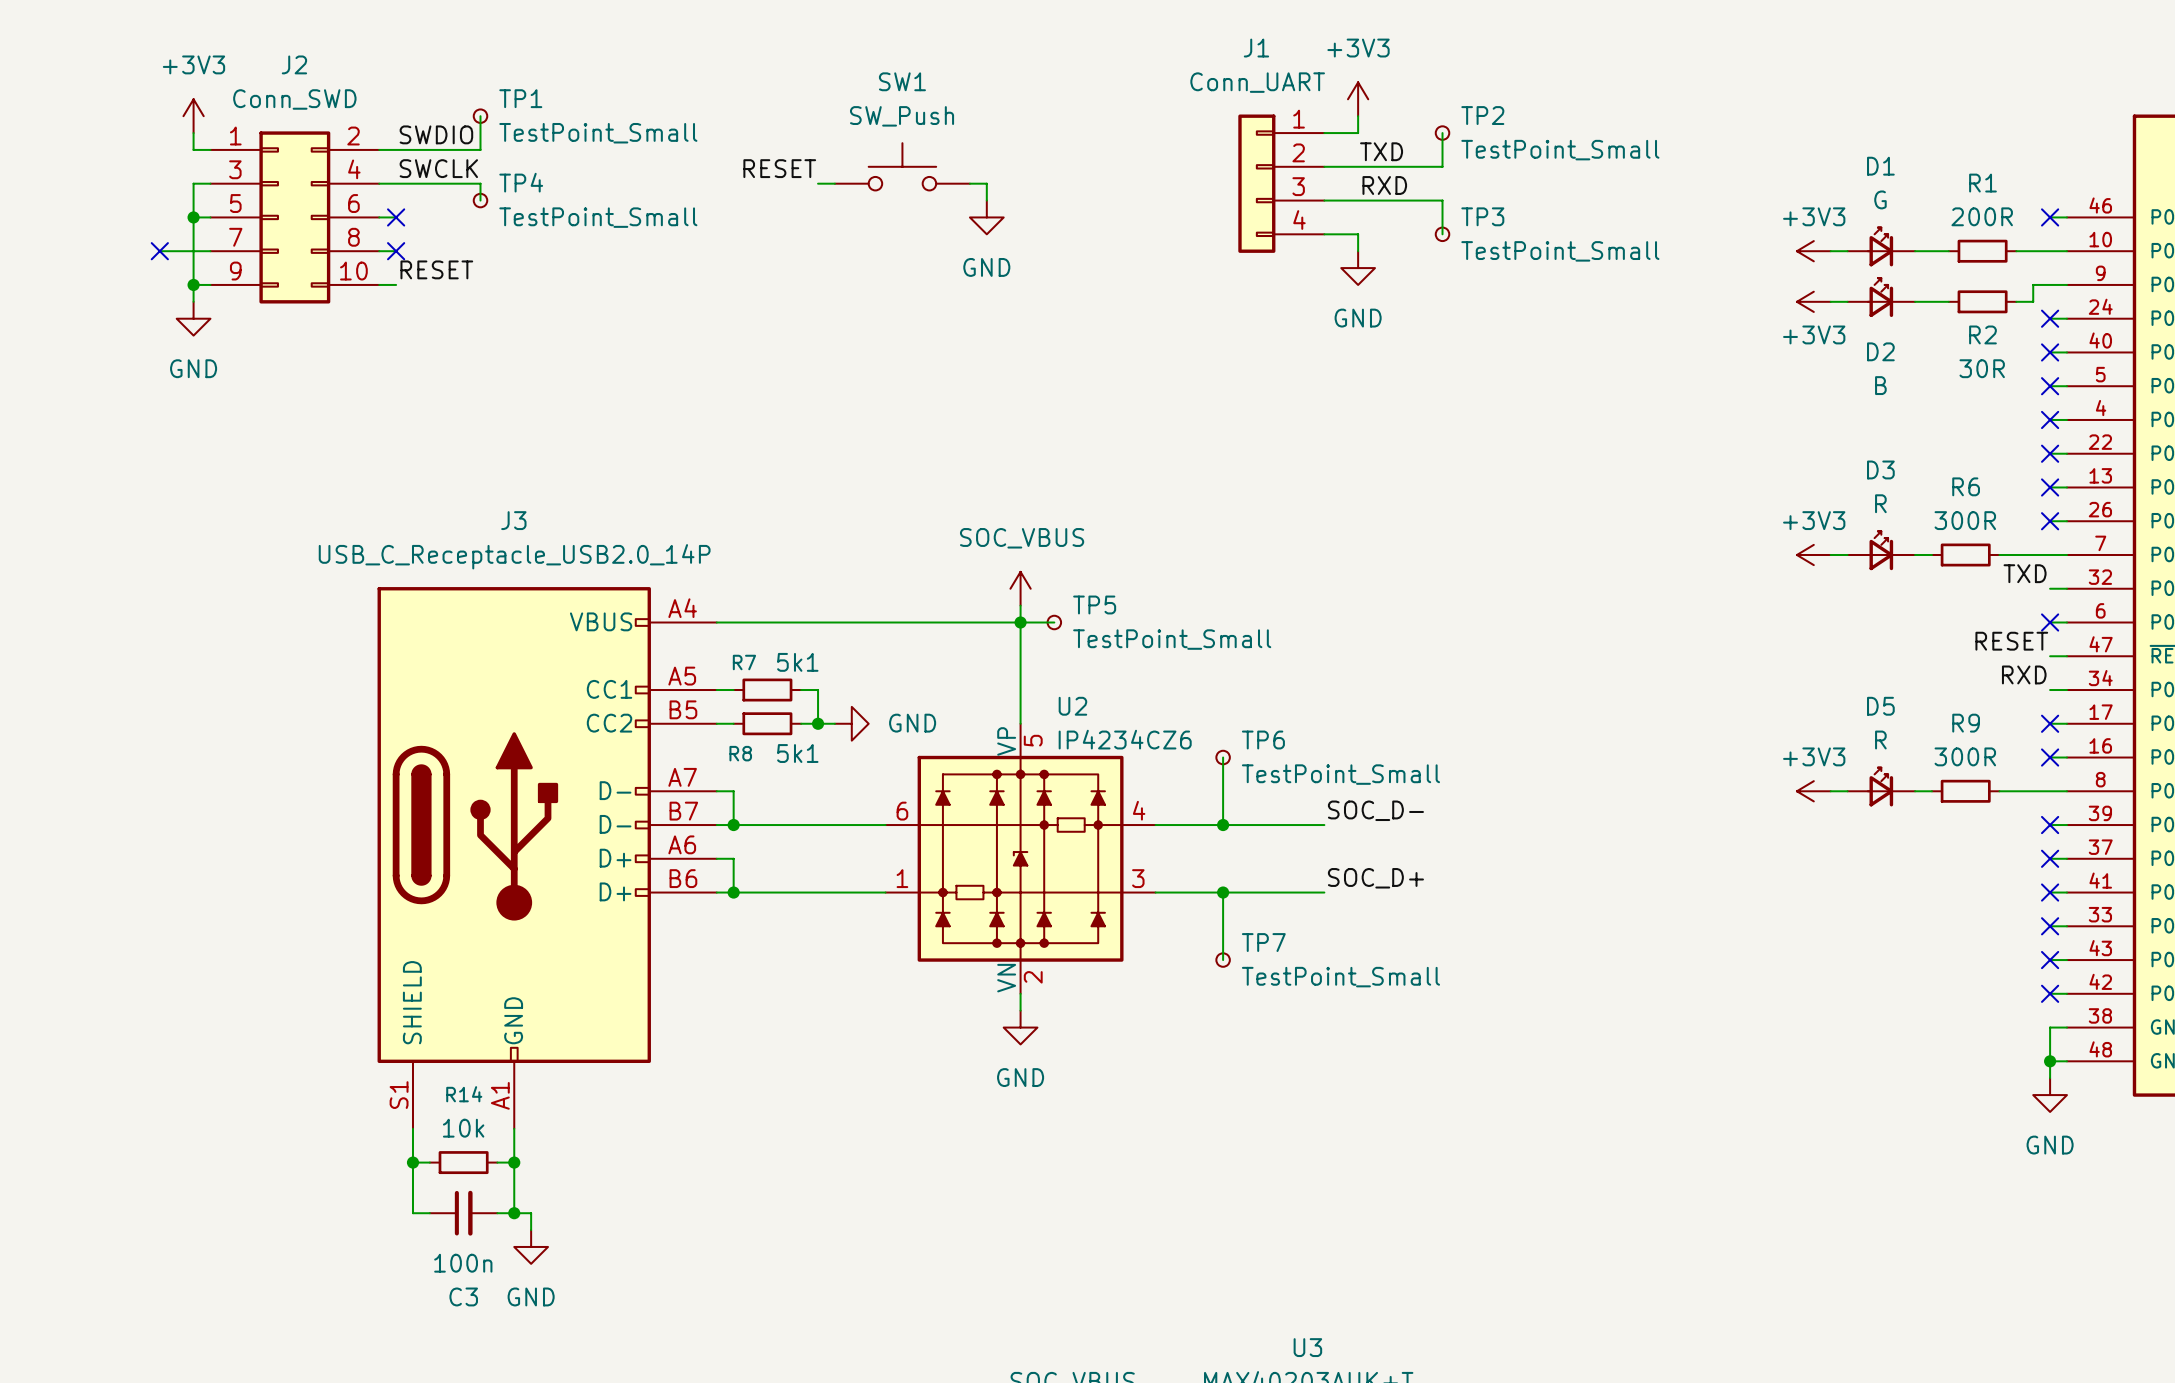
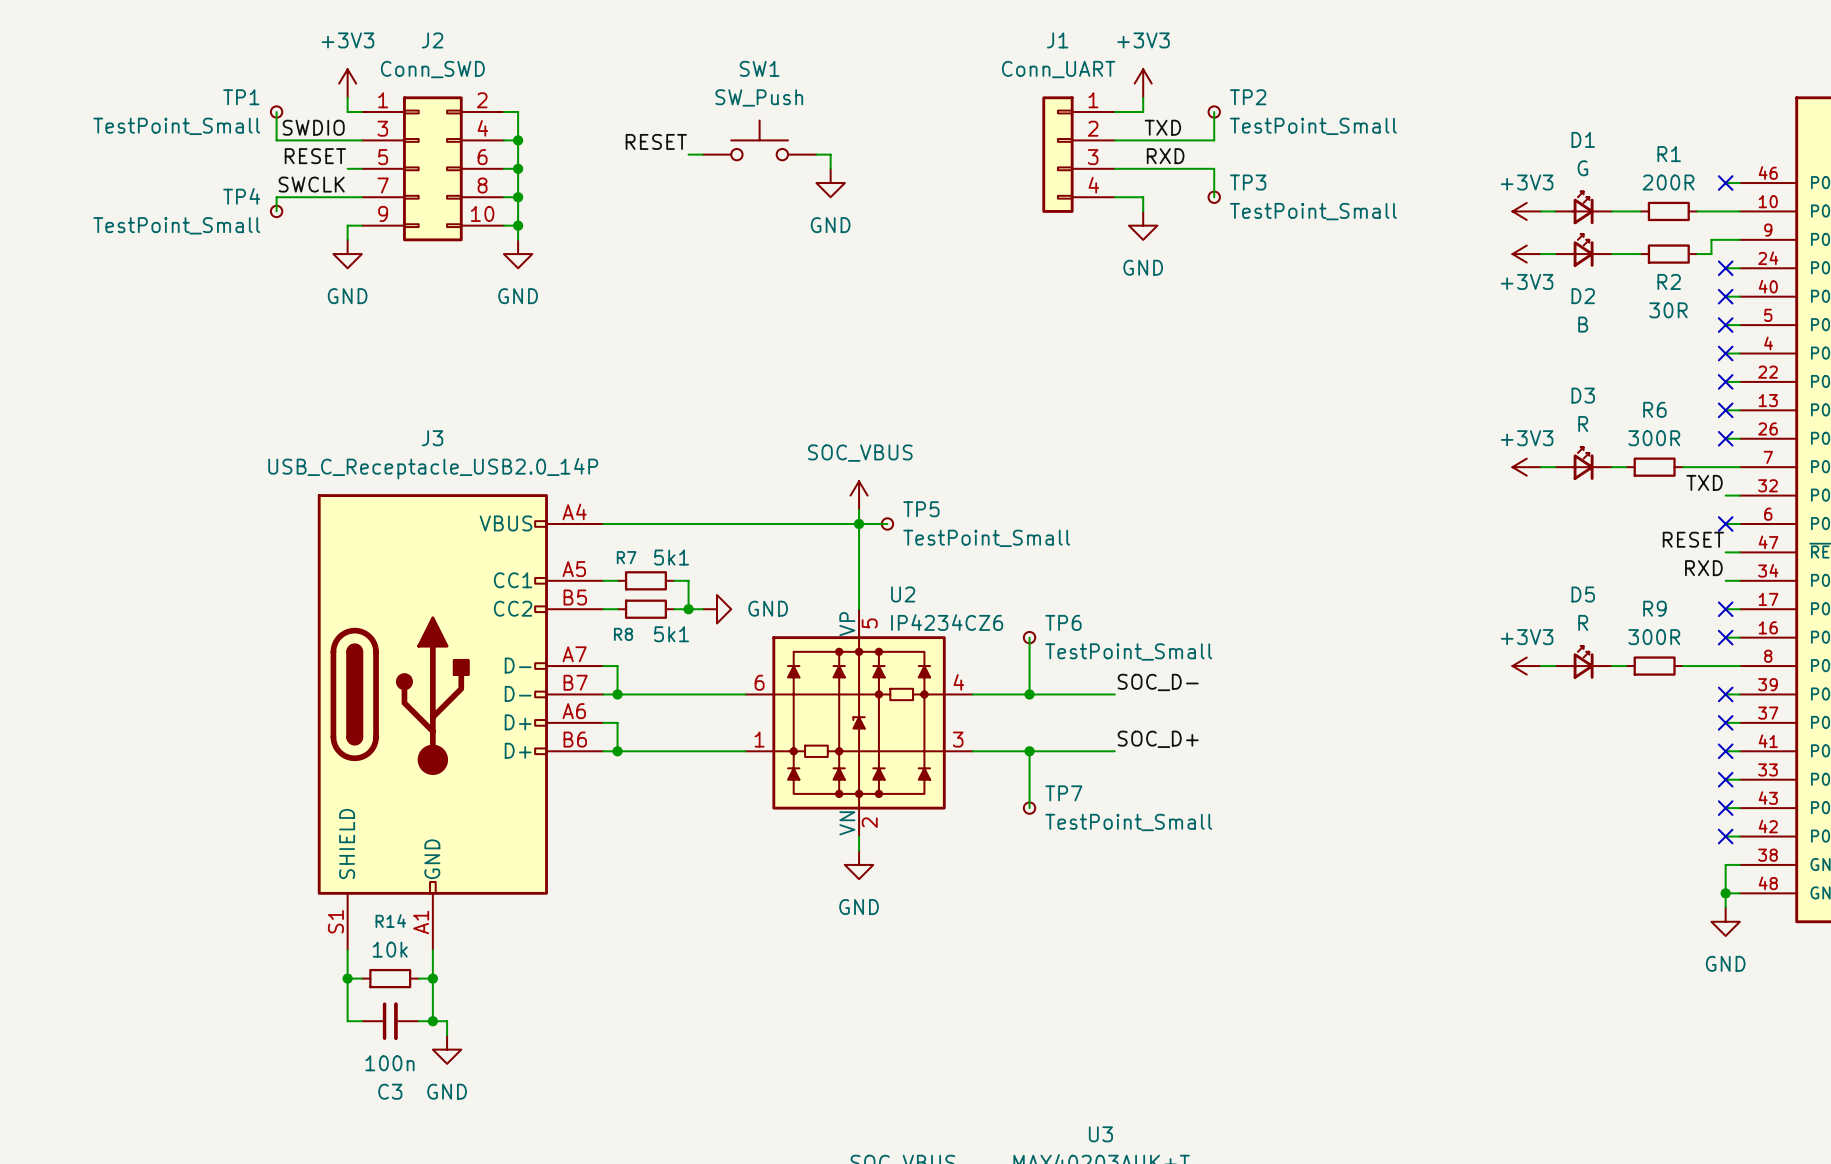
TP1 name position: TP1 (520, 98) -> TP1 (241, 97)
power symbol position: +3V3 (193, 116) -> +3V3 (347, 83)
wire: (480, 116) (480, 149) (379, 149) -> none
TP1 position: (480, 116) -> (276, 112)
wire: (193, 133) (193, 149) (210, 149) -> (347, 97) (347, 112) (361, 112)
wire: none -> (276, 112) (276, 140) (361, 140)
wire: none -> (503, 112) (518, 112) (518, 239)
TP1 value position: TestPoint_Small (598, 133) -> TestPoint_Small (176, 126)
label position: SWDIO (436, 134) -> SWDIO (313, 127)
wire: none -> (503, 140) (518, 140)
junction: none -> (518, 140)
label position: SWCLK (438, 168) -> SWCLK (311, 184)
TP4 name position: TP4 (521, 182) -> TP4 (241, 196)
wire: (210, 183) (193, 183) (193, 301) -> none
wire: (379, 183) (480, 183) (480, 200) -> none
TP4 position: (480, 200) -> (276, 211)
junction: none -> (518, 168)
wire: (193, 217) (210, 217) -> (347, 168) (361, 168)
junction: (193, 217) -> none
J2 position: (294, 217) -> (432, 168)
wire: (379, 217) (396, 217) -> (503, 168) (518, 168)
no-connect mark: (396, 217) -> none
TP4 value position: TestPoint_Small (598, 217) -> TestPoint_Small (176, 225)
wire: none -> (361, 197) (276, 197) (276, 211)
junction: none -> (518, 197)
wire: (159, 251) (210, 251) -> none
no-connect mark: (159, 251) -> none
wire: (379, 251) (396, 251) -> (503, 197) (518, 197)
no-connect mark: (396, 251) -> none
wire: none -> (361, 225) (347, 225) (347, 239)
junction: none -> (518, 225)
label position: RESET (436, 269) -> RESET (315, 156)
wire: (193, 284) (210, 284) -> none
junction: (193, 284) -> none
wire: (379, 284) (396, 284) -> (503, 225) (518, 225)
power symbol: none -> GND (347, 254)
power symbol: none -> GND (518, 254)
power symbol: GND (193, 318) -> none

